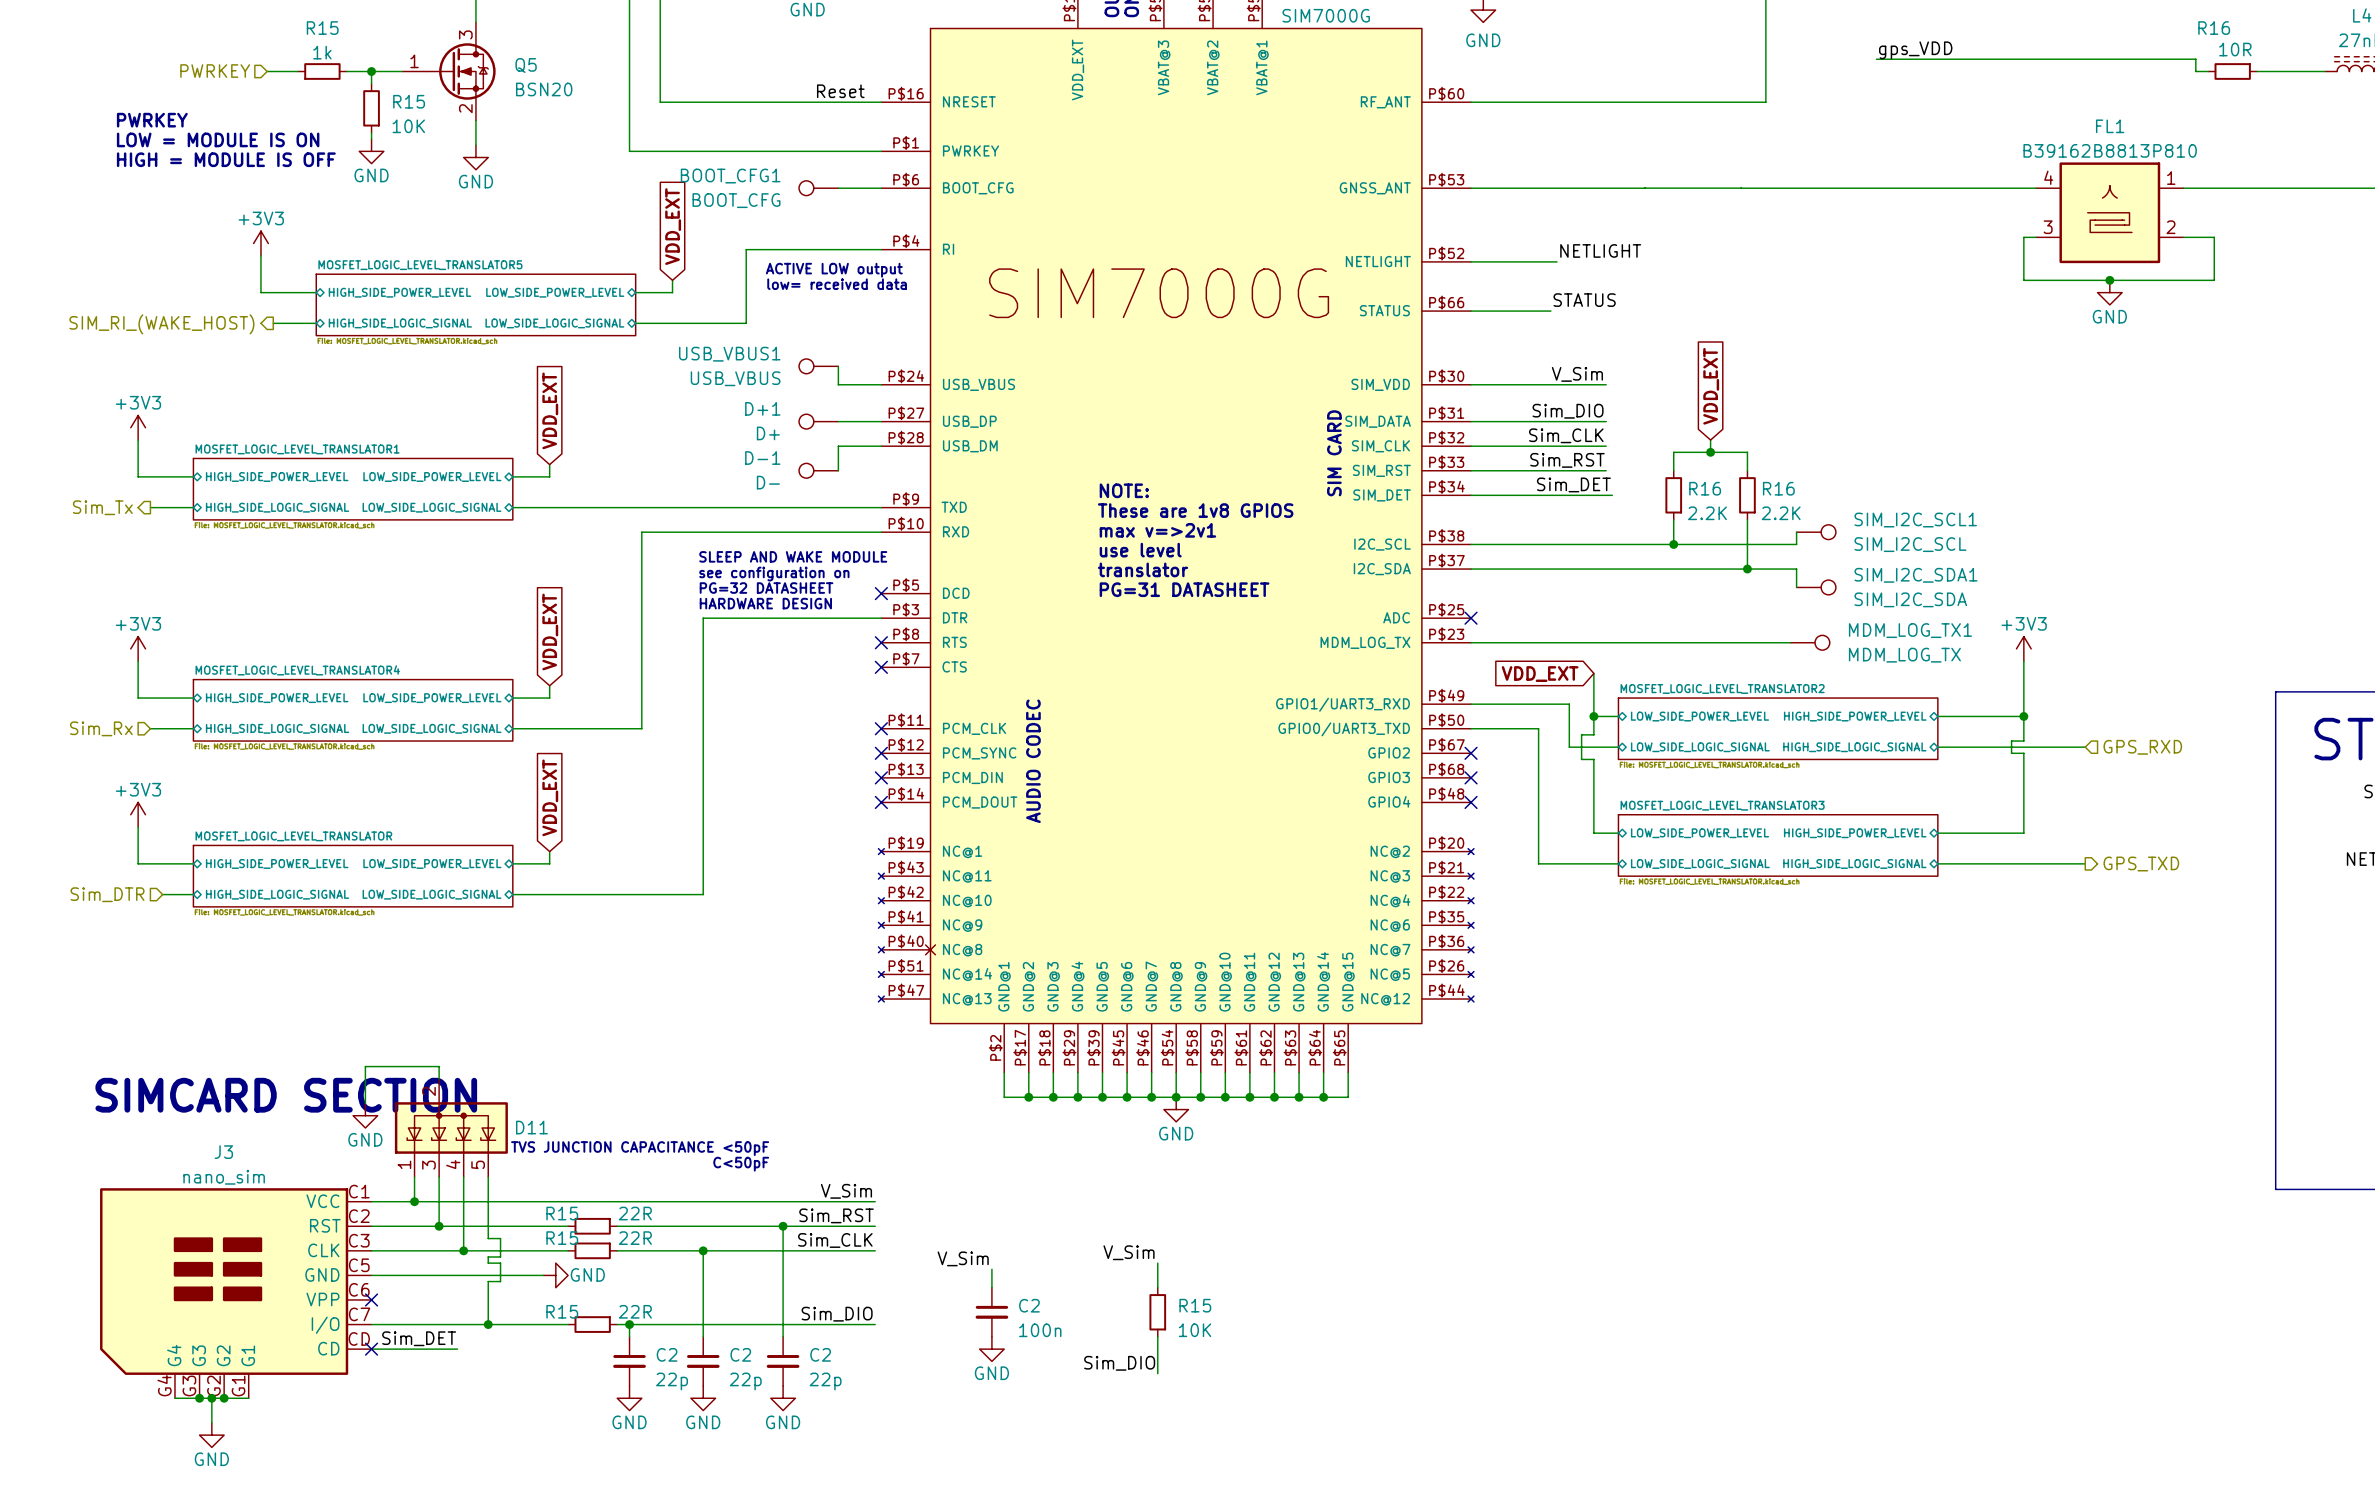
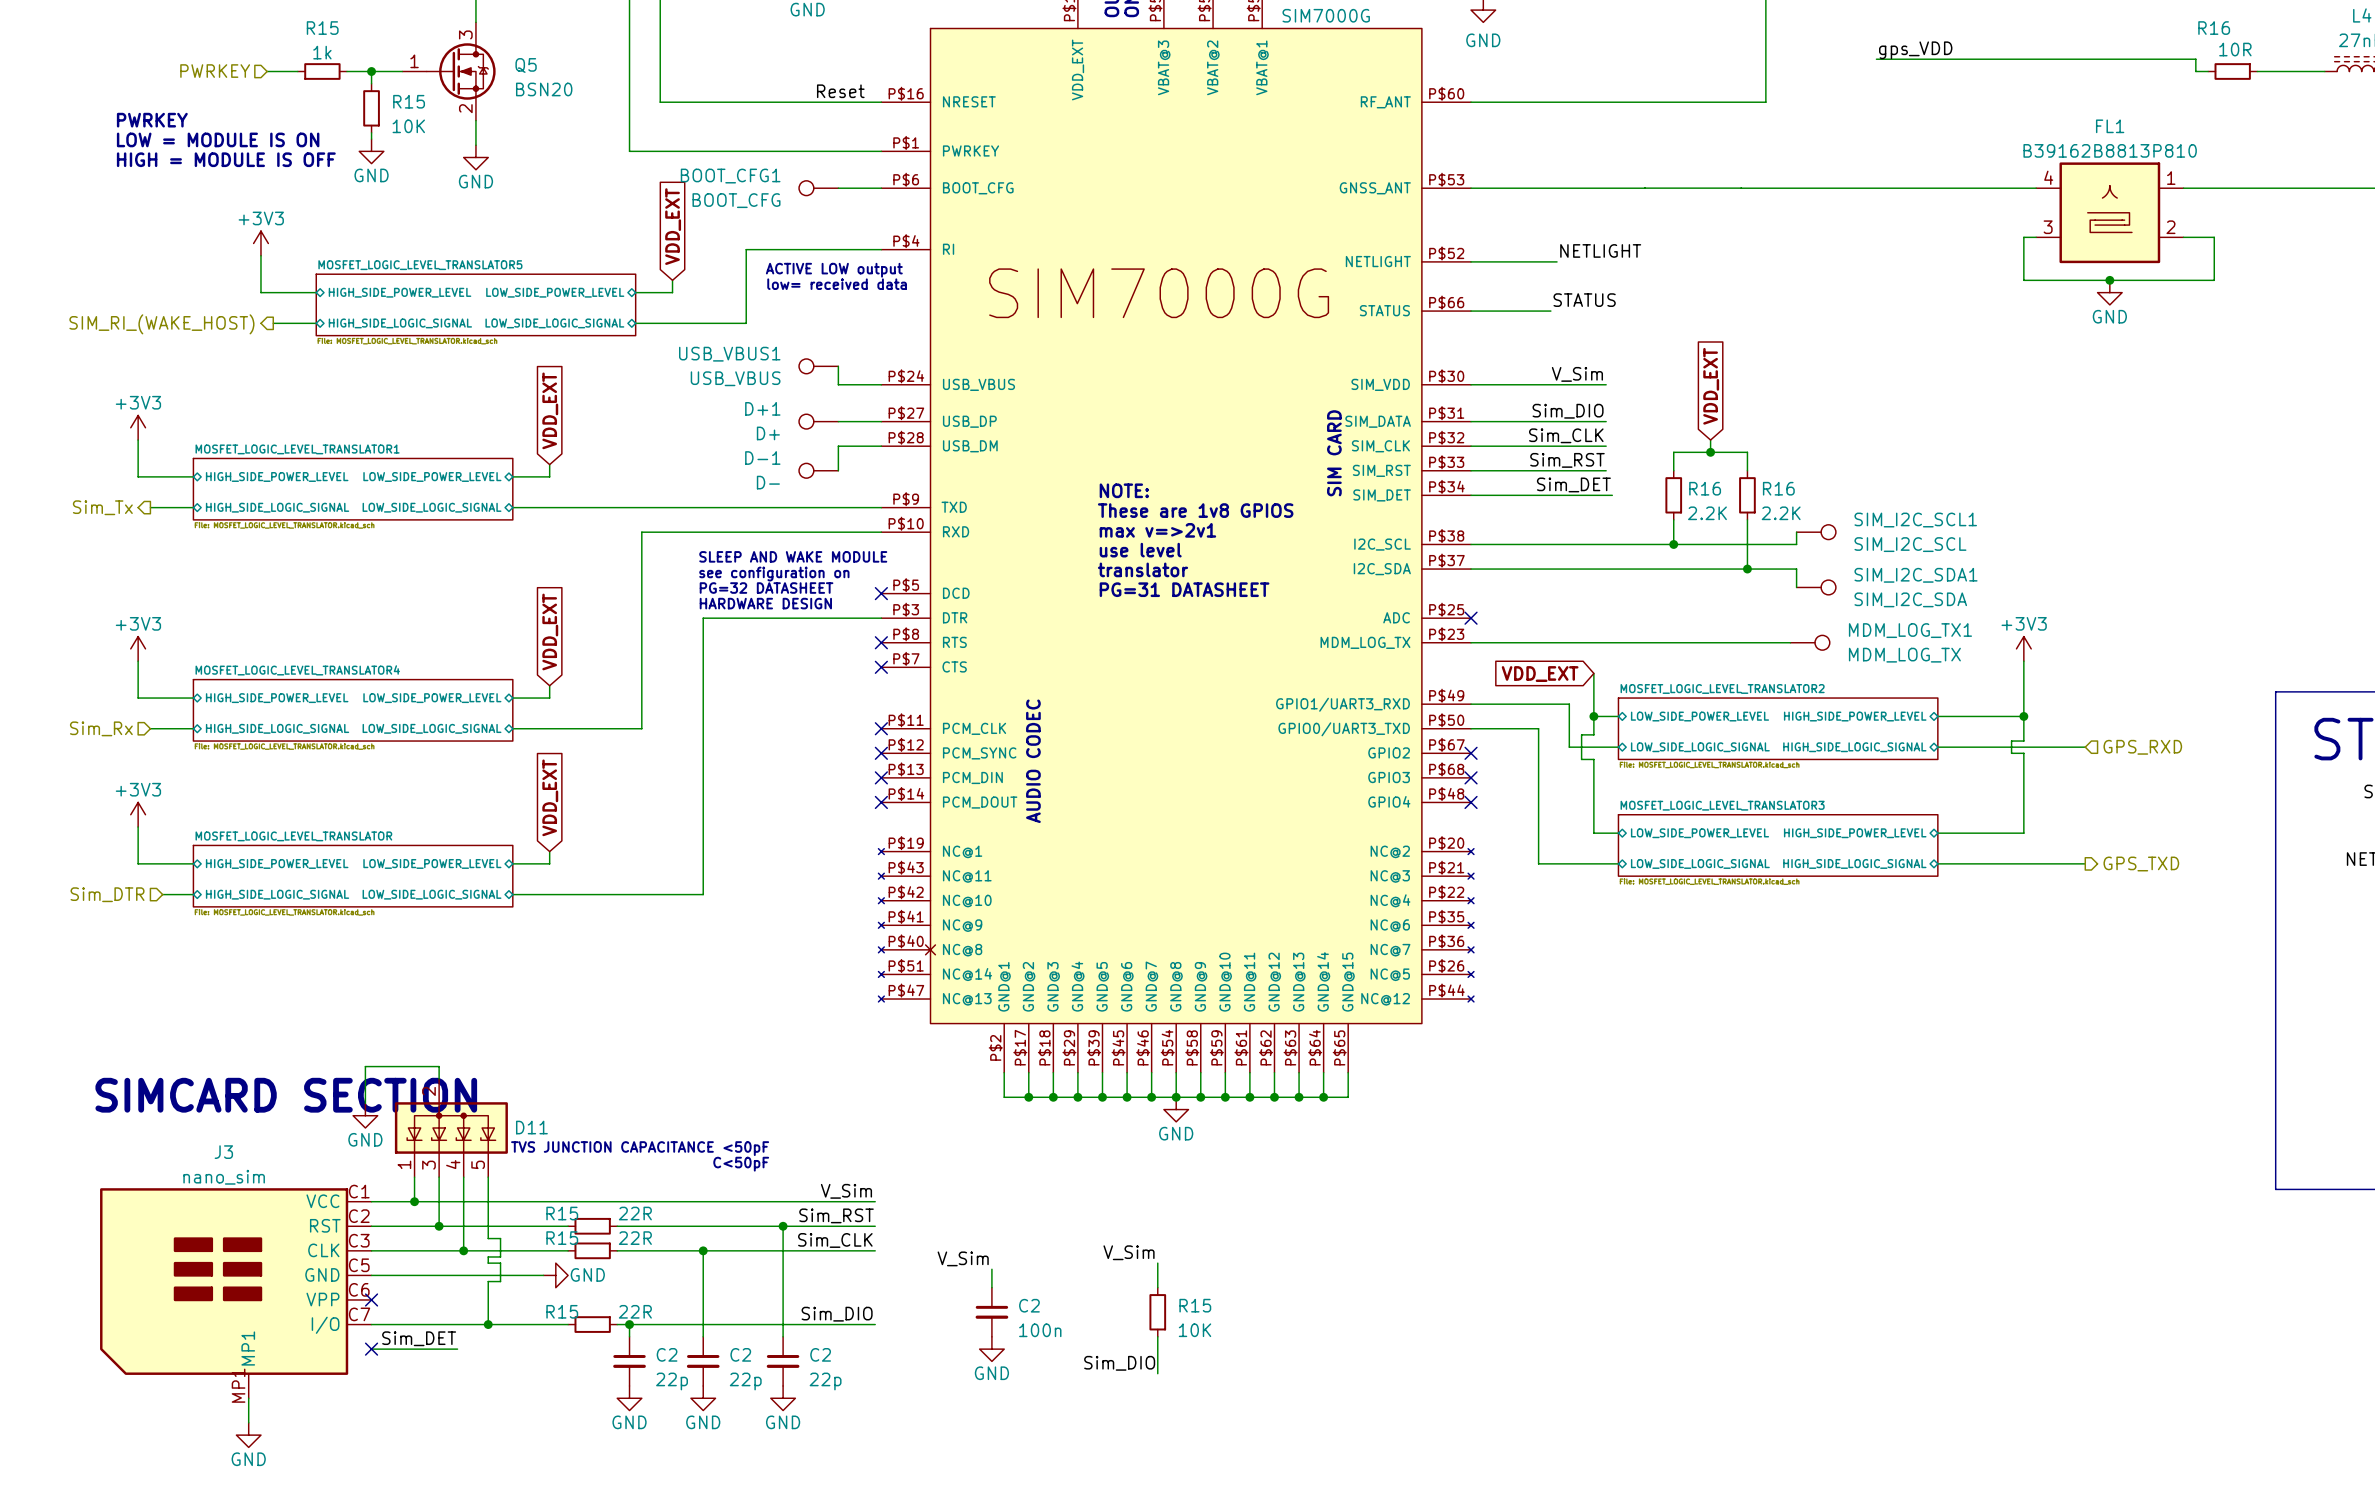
J3 symbol: [100, 1188, 372, 1399] -> [100, 1188, 372, 1399]
wire: (174, 1398) (248, 1398) -> (248, 1422) (248, 1398)
junction: (199, 1398) -> none
wire: (211, 1398) (211, 1422) -> none
junction: (211, 1398) -> none
junction: (224, 1398) -> none
power symbol position: GND (211, 1435) -> GND (248, 1435)

